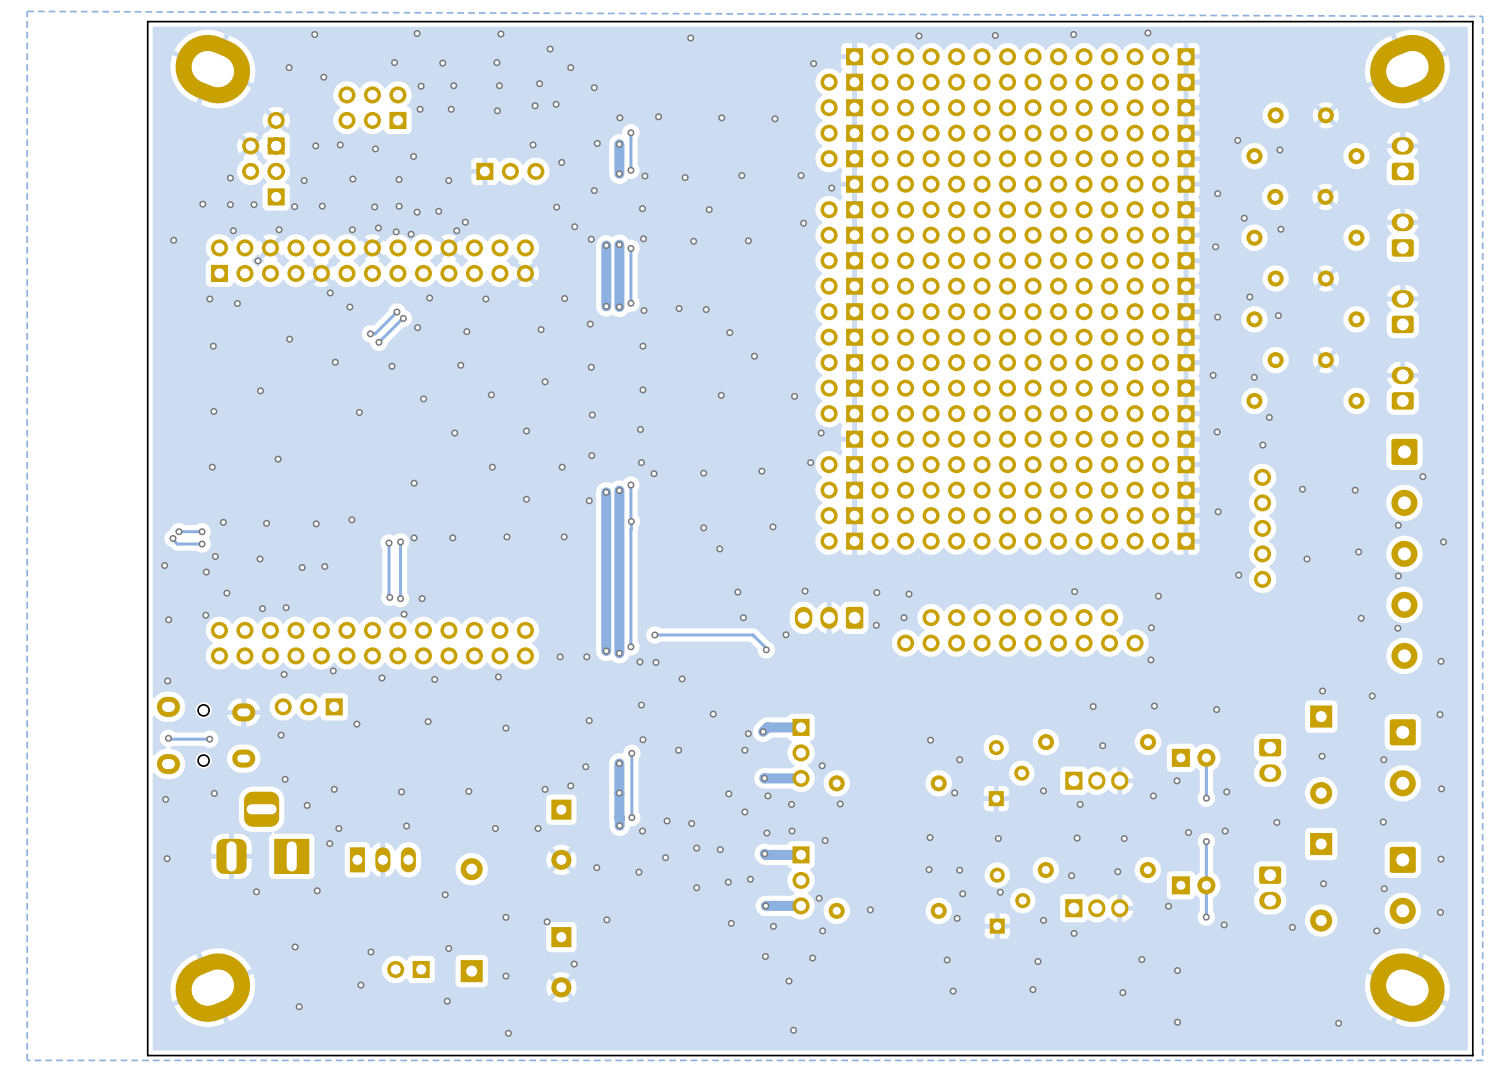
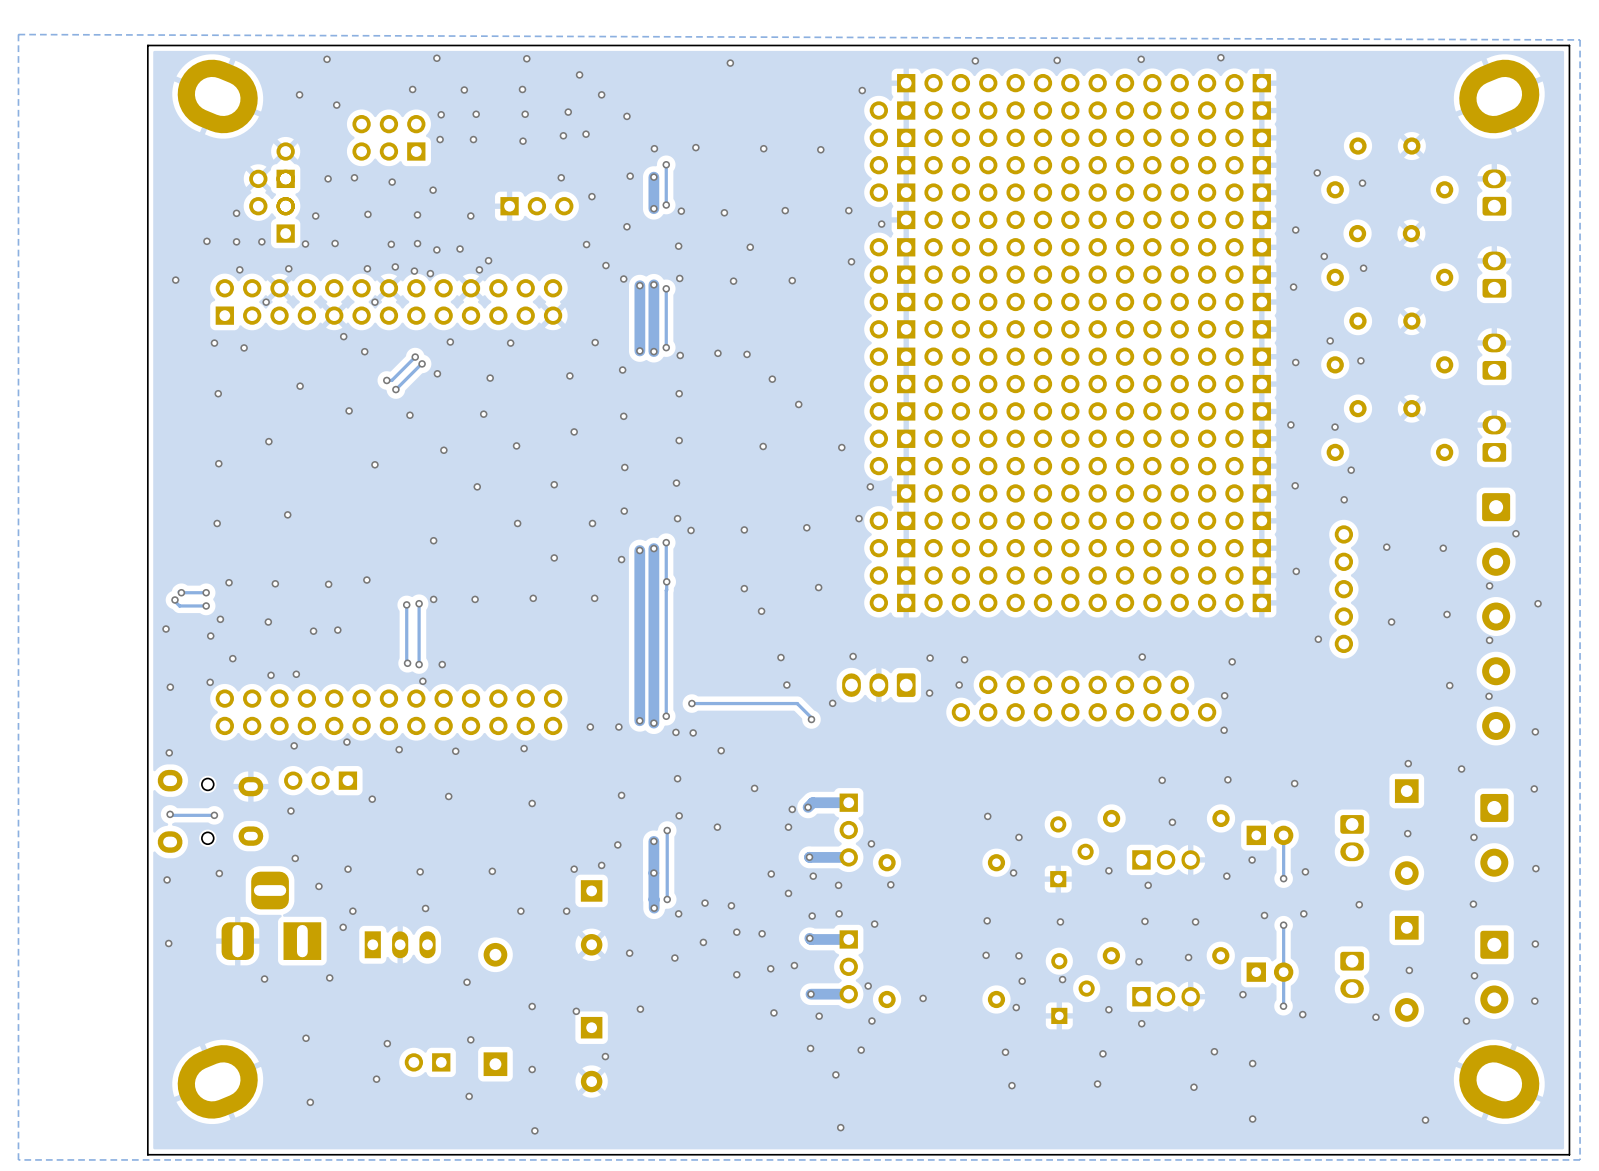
via: none -> (374, 302)

